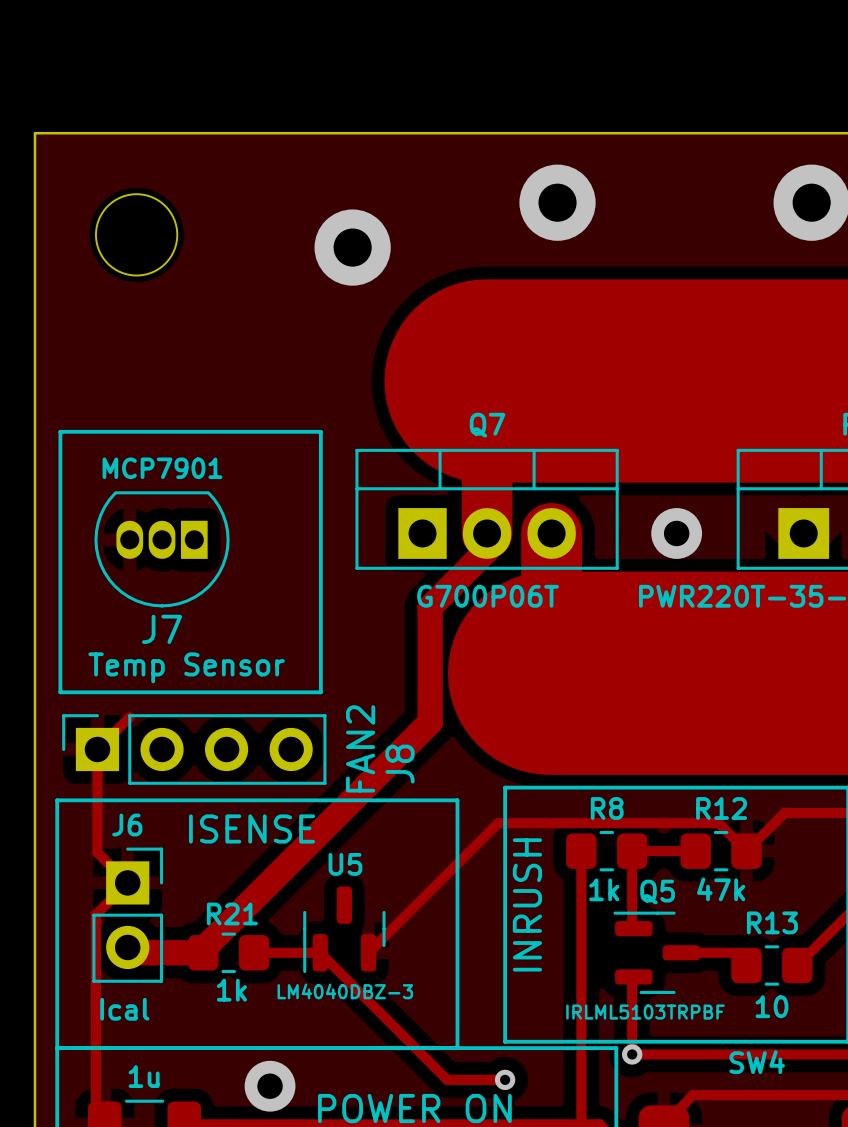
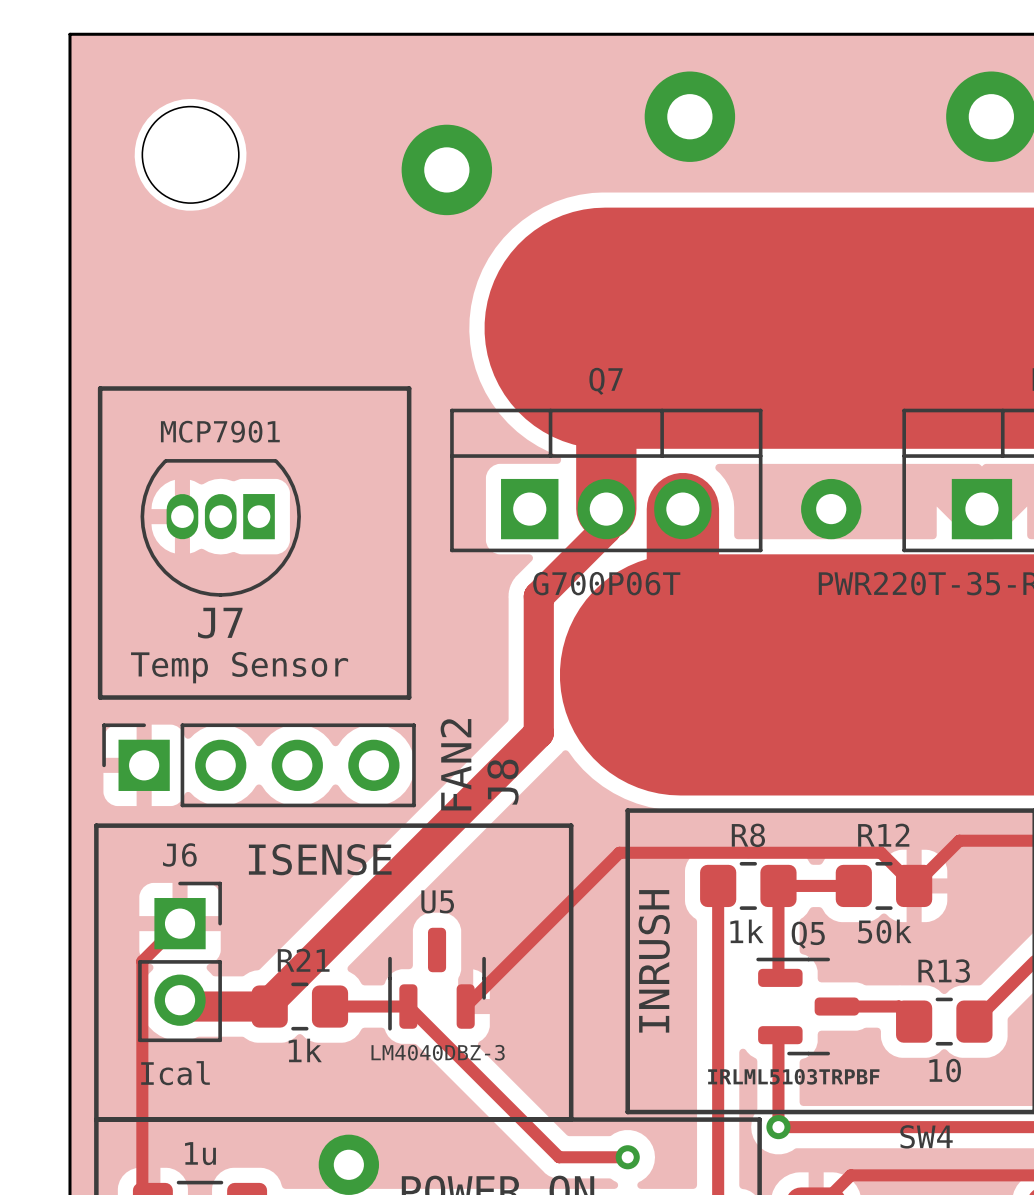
track: (129, 717) (97, 749) (97, 852) (127, 882) -> none
R12 value: 47k (721, 889) -> 50k (884, 931)

